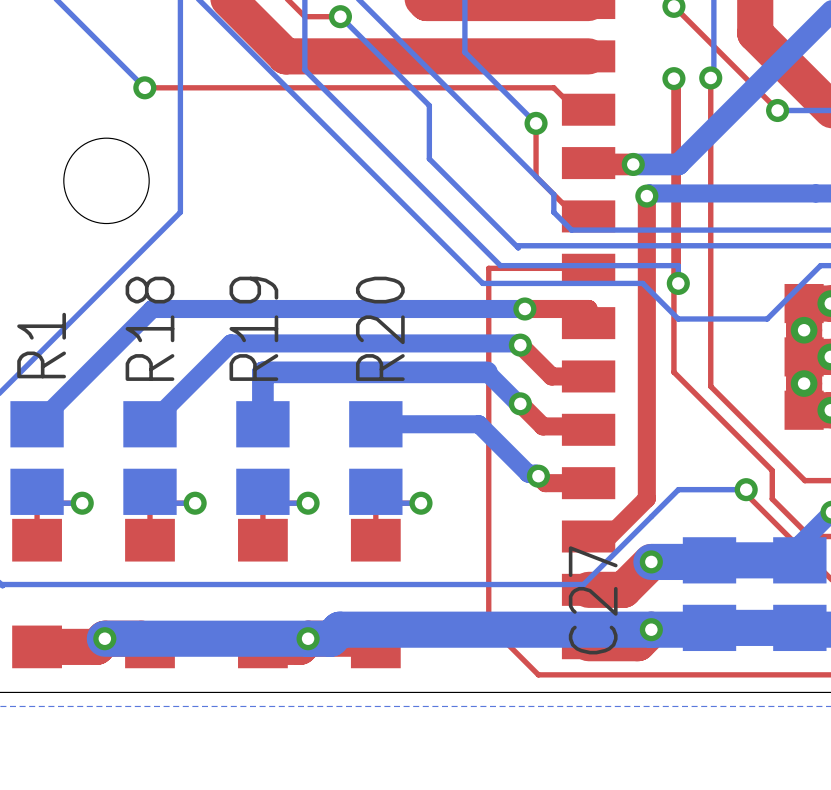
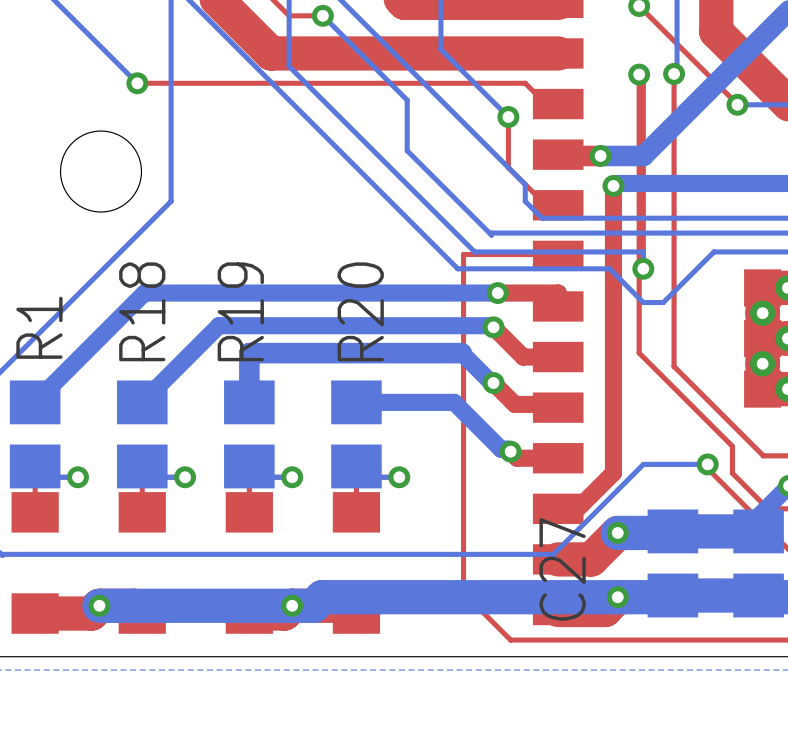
bottom track: (820, 265) (767, 318) (699, 318) -> (778, 251) (713, 251) (663, 302)

